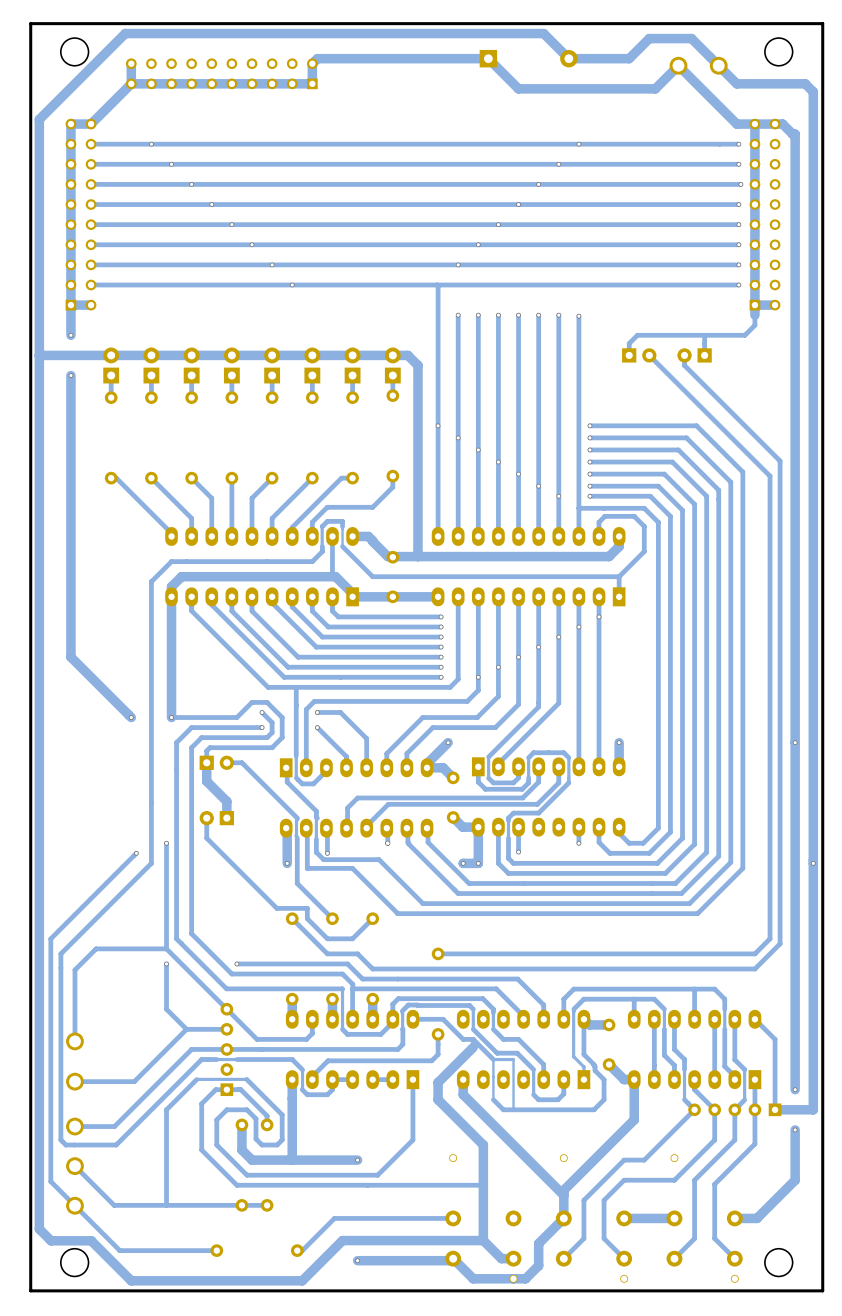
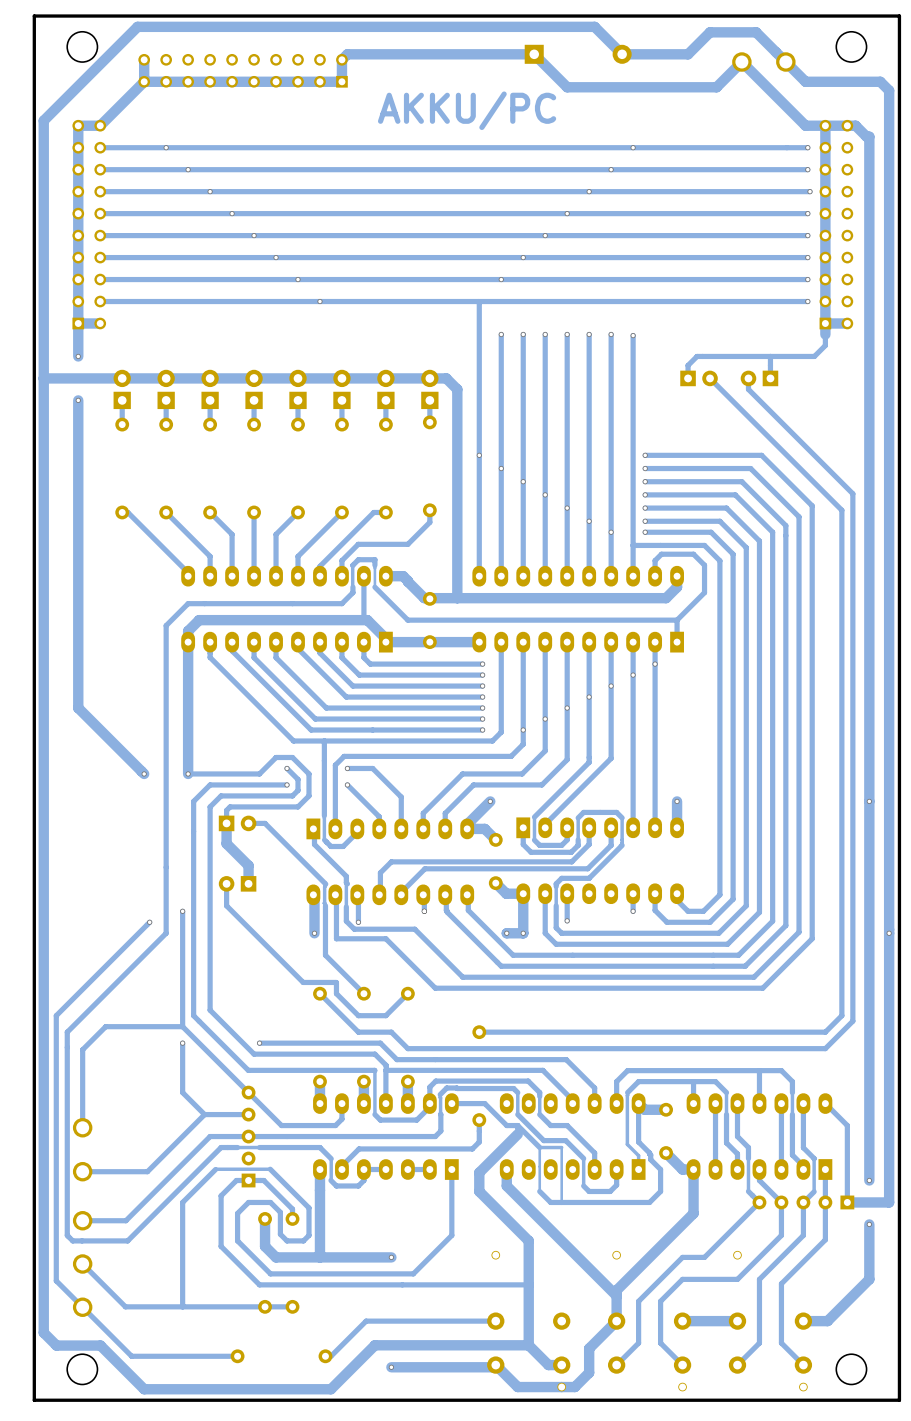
text: none -> AKKU/PC (467, 110)

